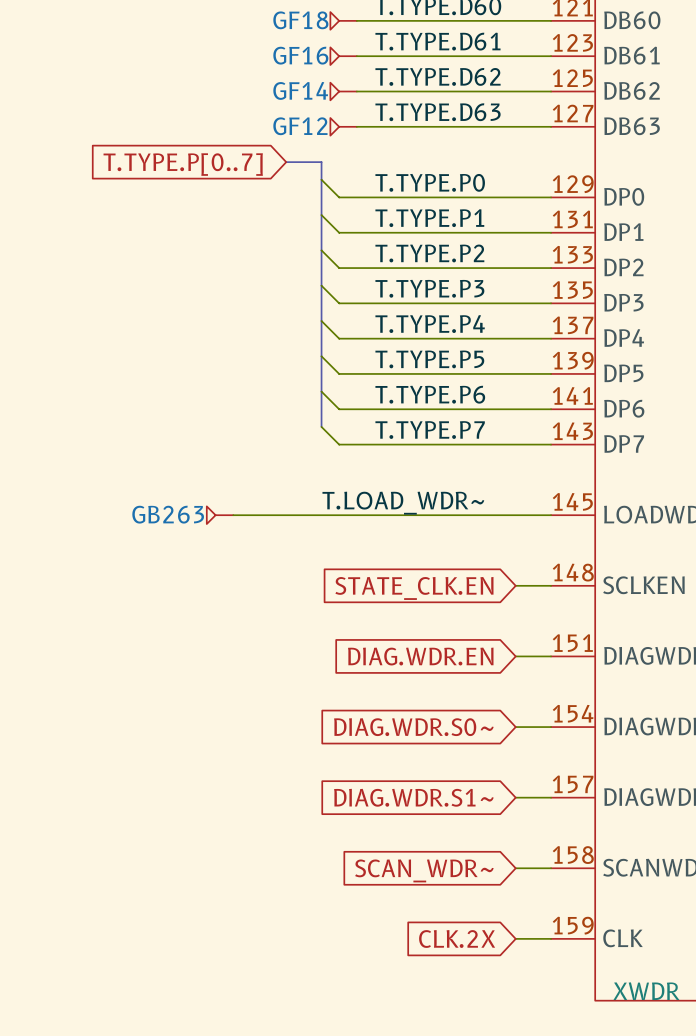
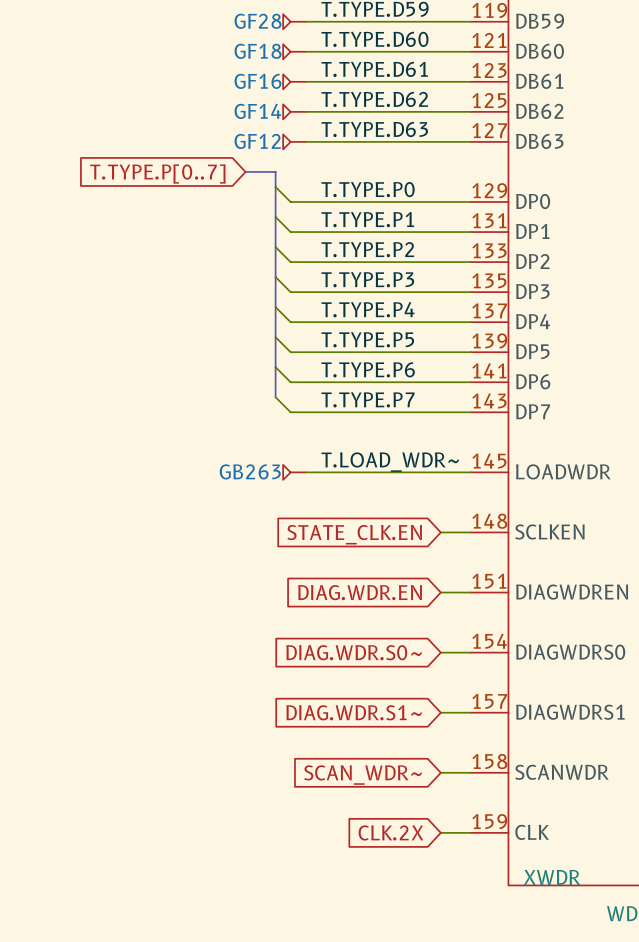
label position: T.LOAD_WDR~ (403, 503) -> T.LOAD_WDR~ (390, 462)
GB263 position: (219, 515) -> (294, 472)
wire: (233, 515) (356, 515) -> none

